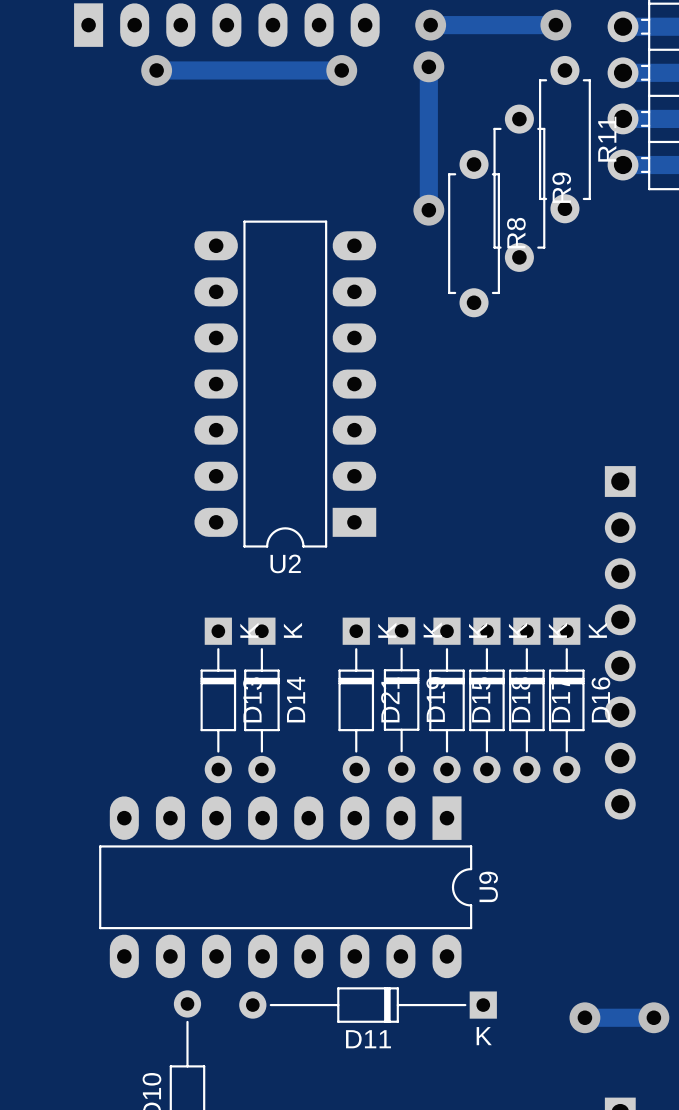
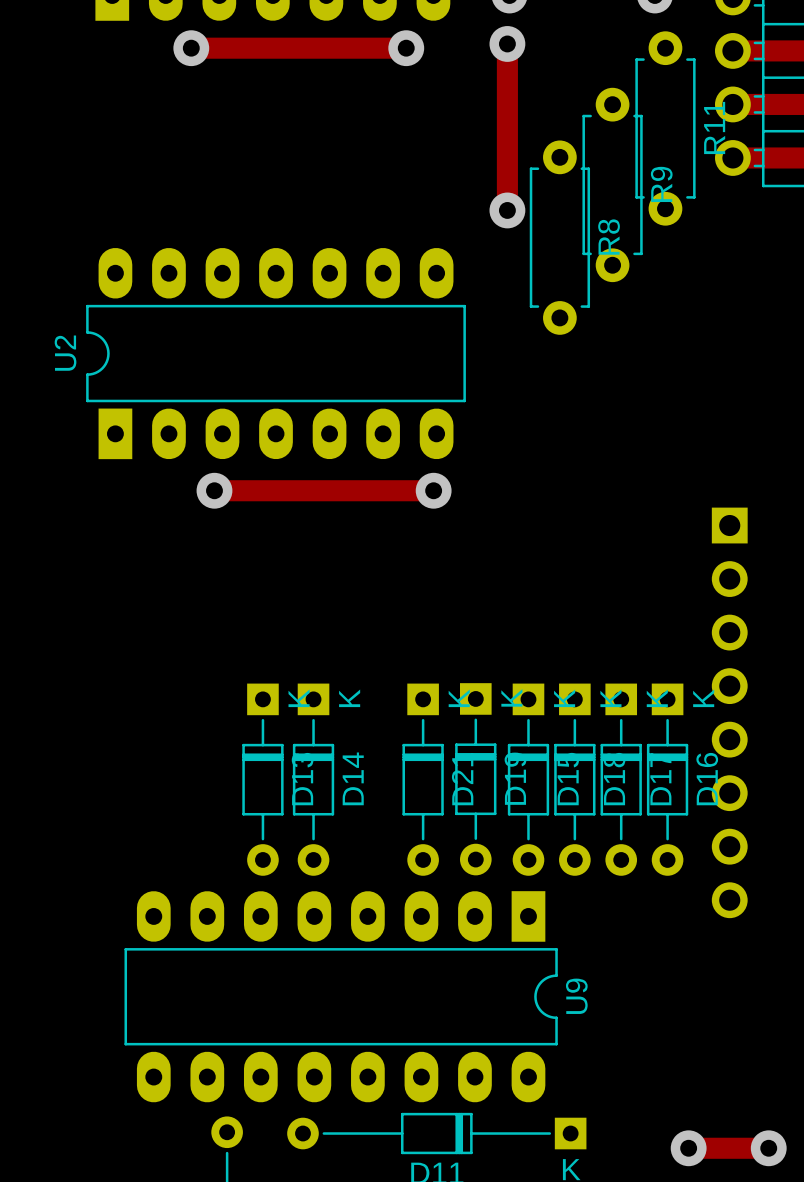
U2 rotation: 0° (285, 384) -> 90° clockwise (276, 353)
track: none -> (214, 490) (433, 490)
via: none -> (214, 490)
via: none -> (433, 490)

